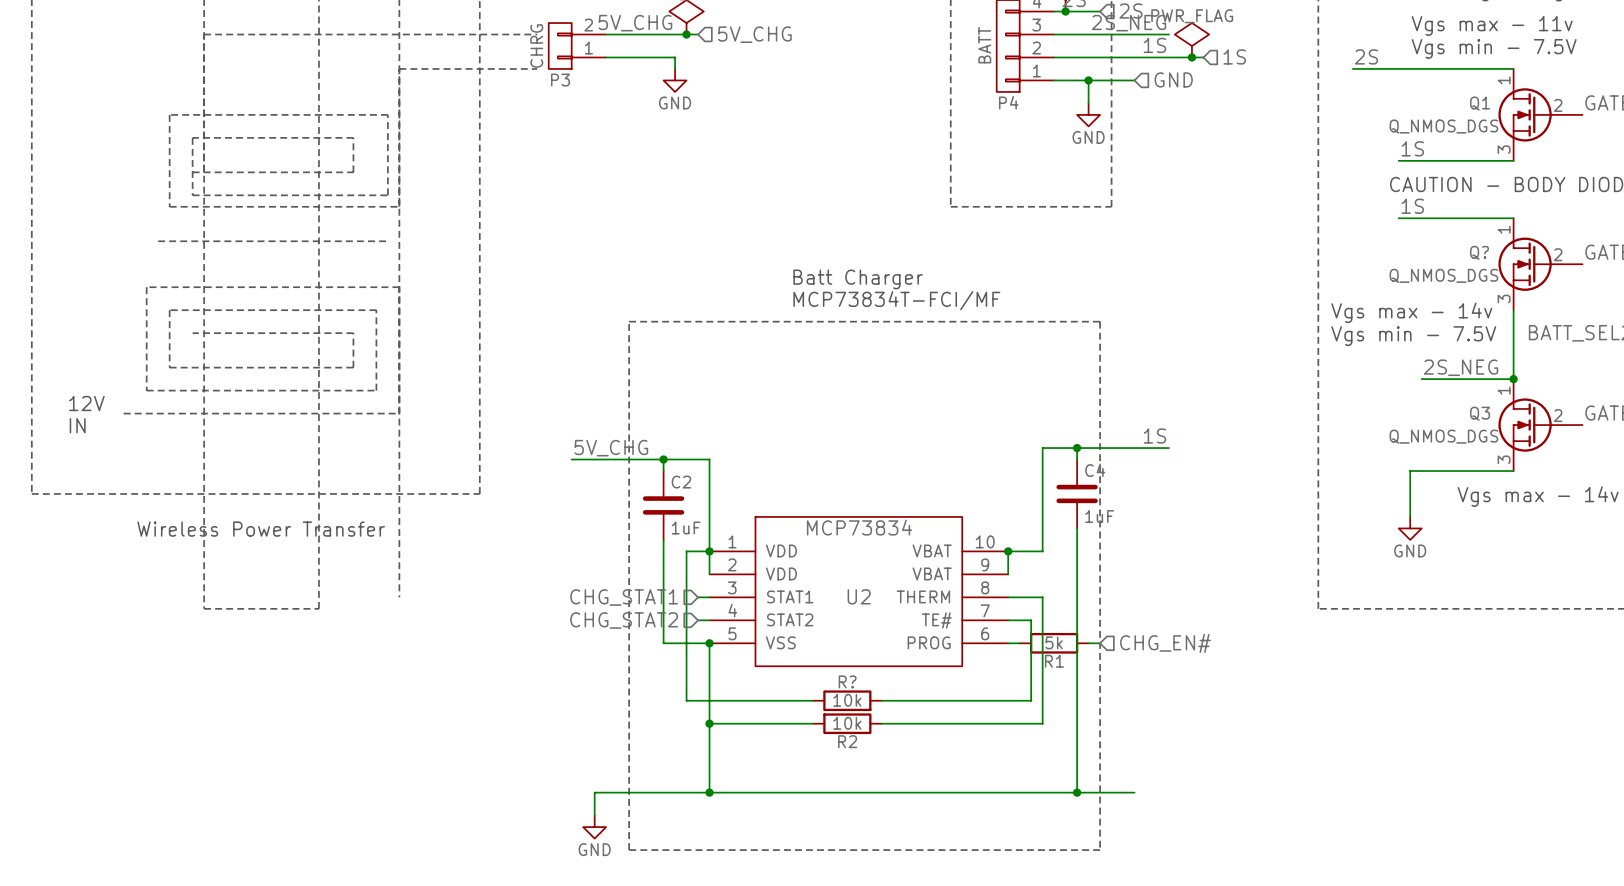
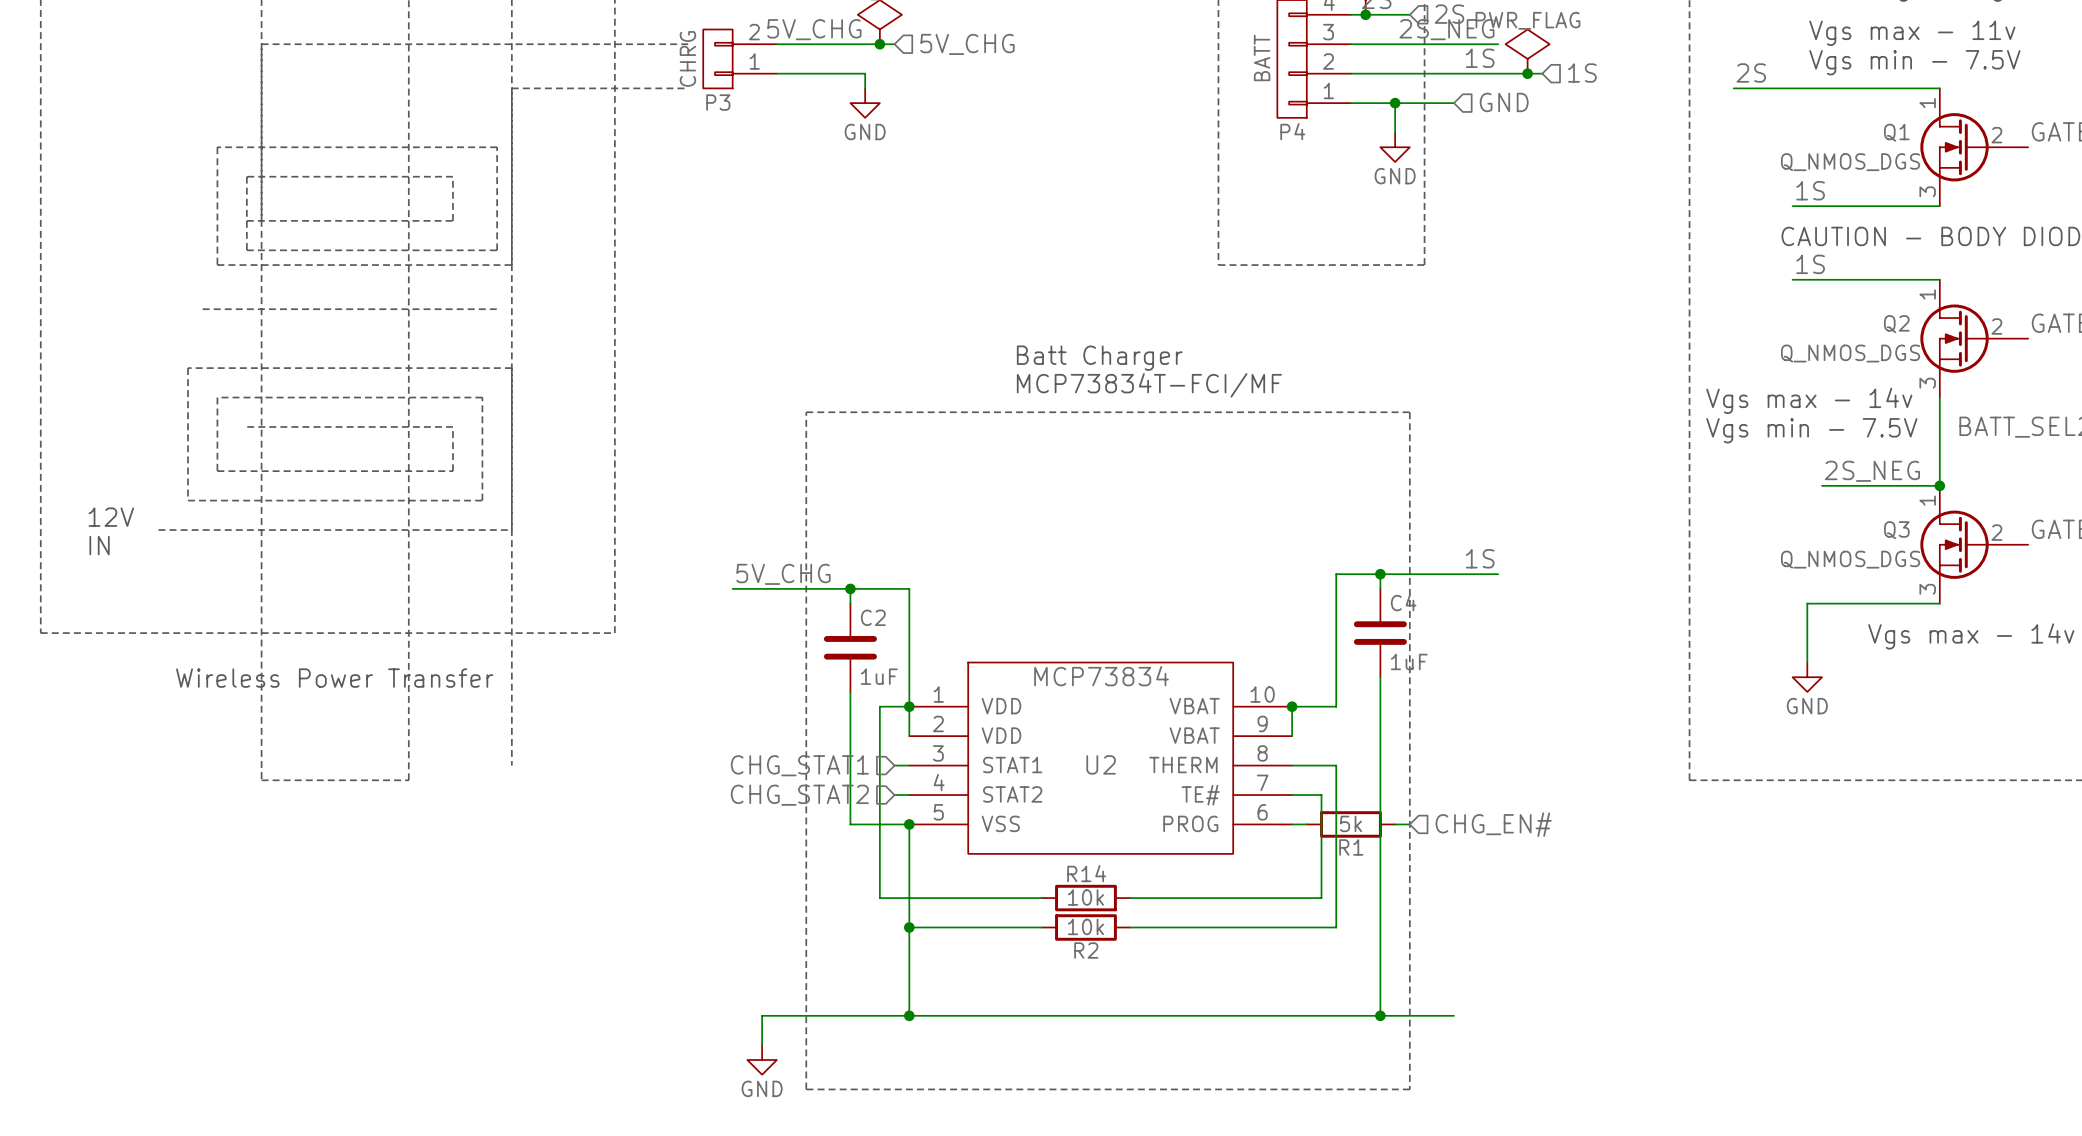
Q? name: Q? (1479, 252) -> Q2 (1896, 324)
R? name: R? (847, 681) -> R14 (1086, 873)

